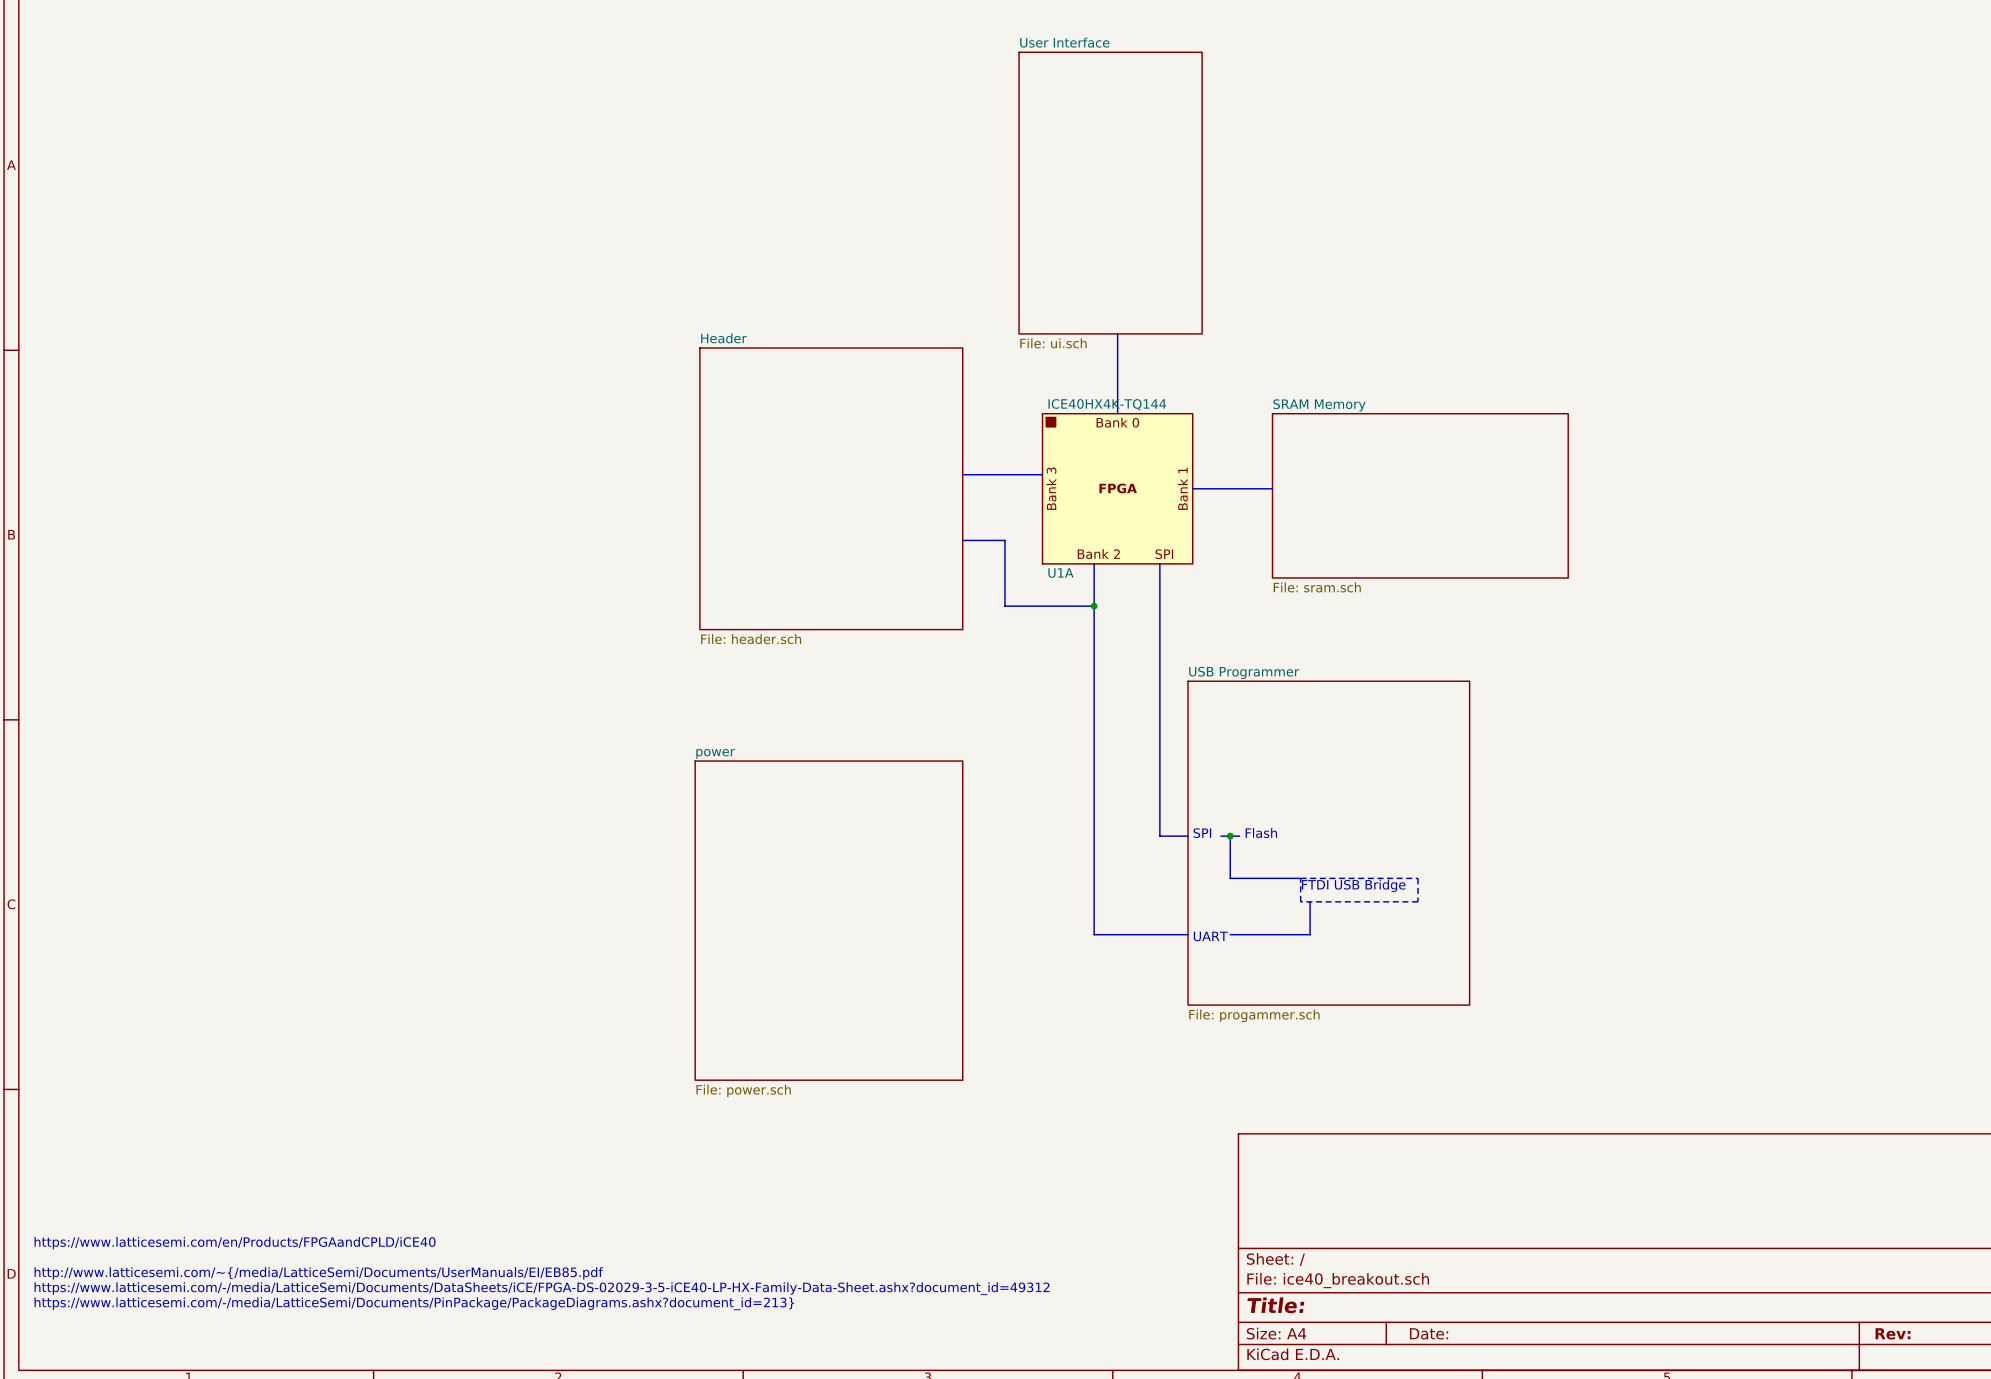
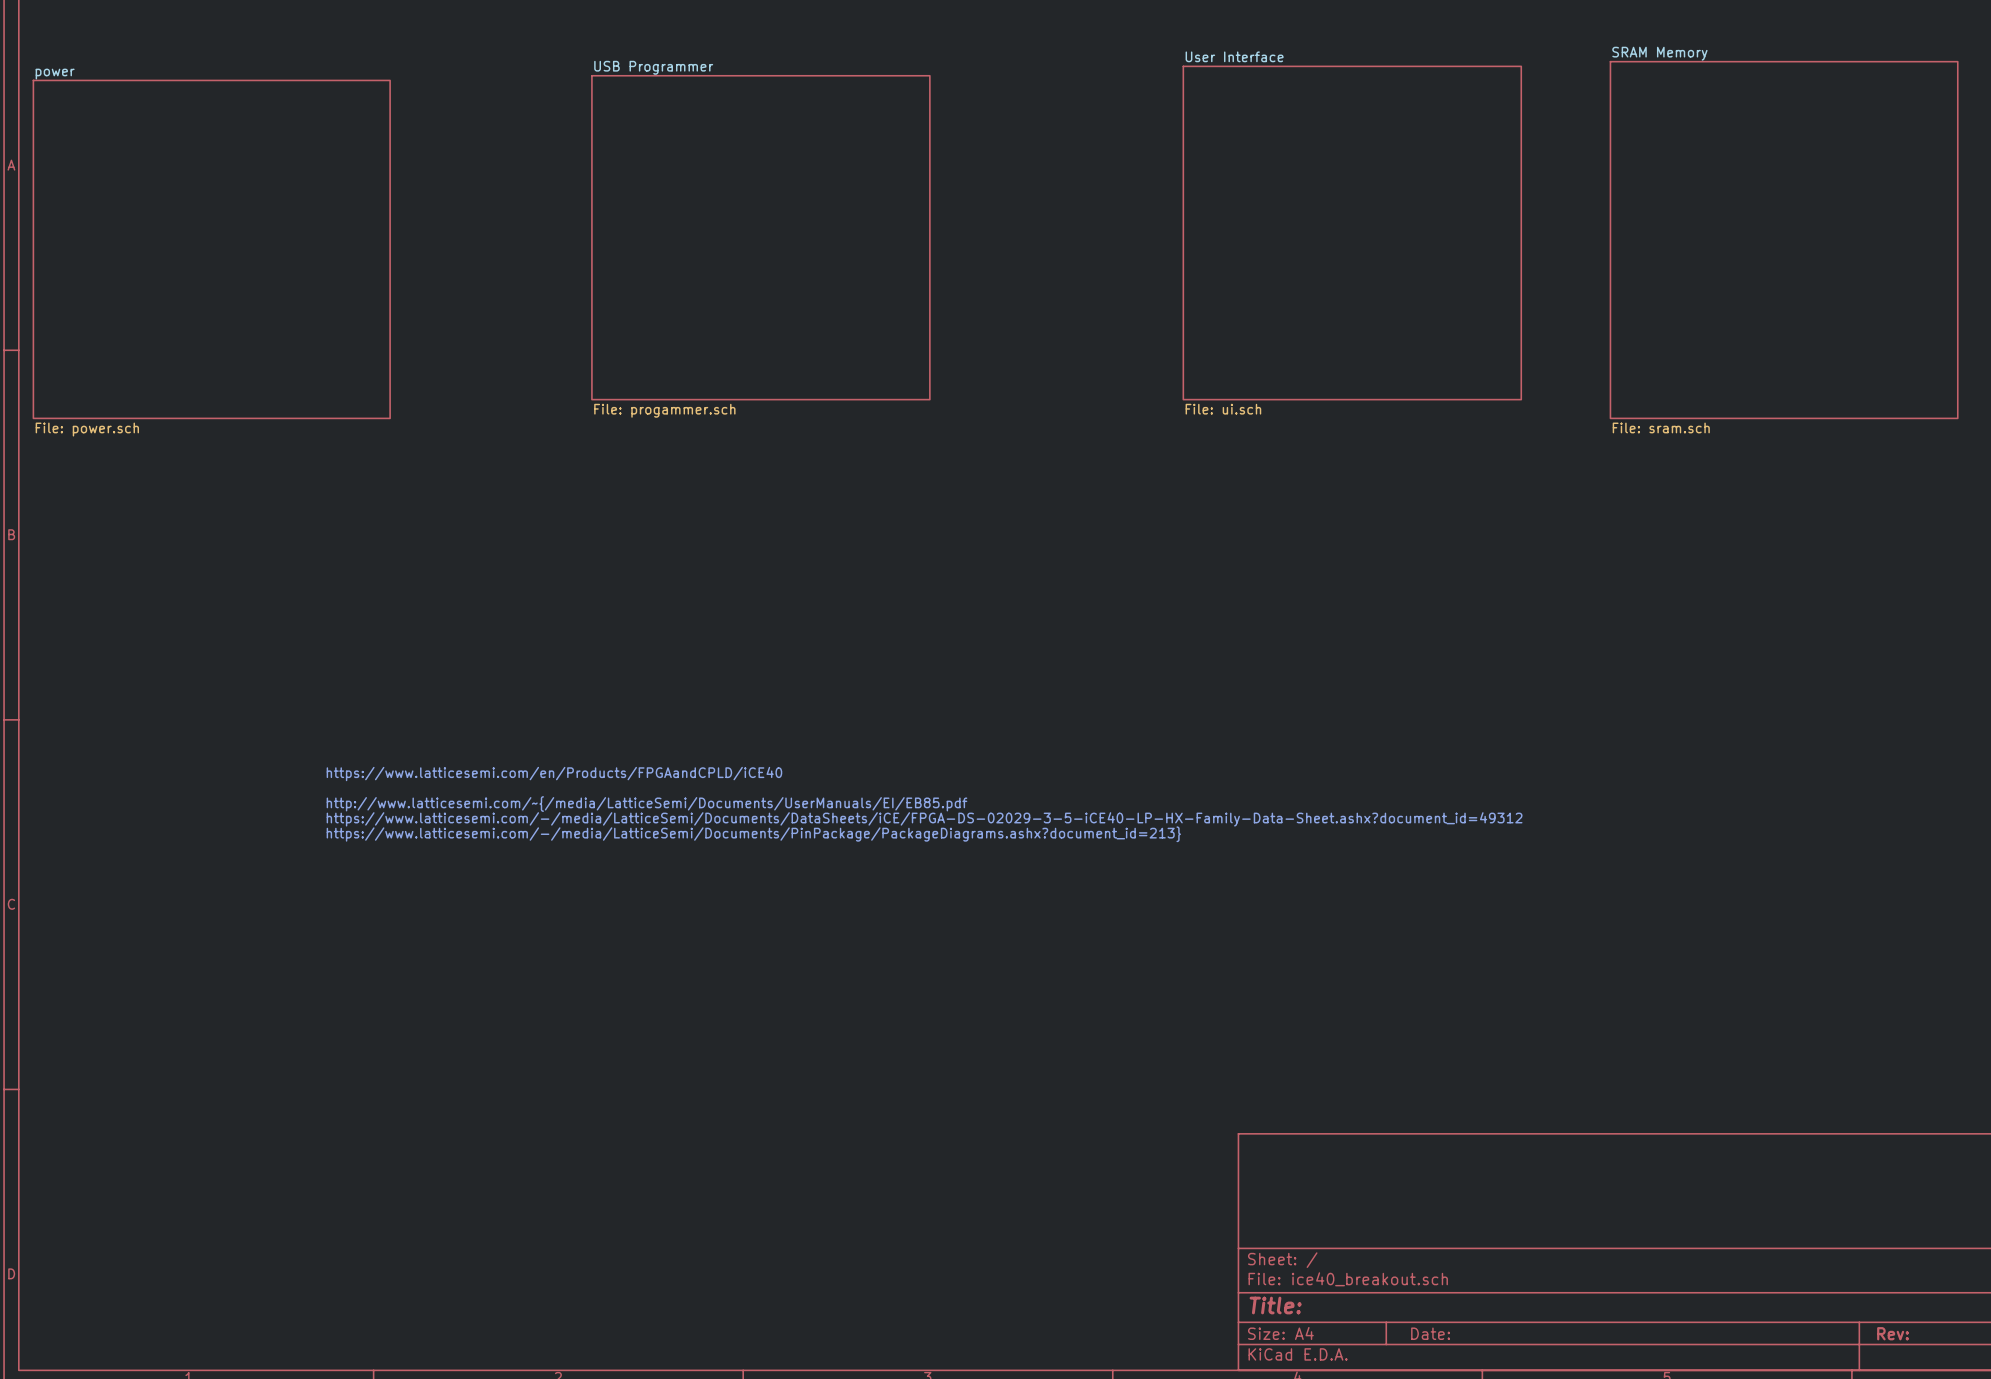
sheet User Interface: File: ui.sch (1110, 193) -> none
sheet User Interface: none -> File: ui.sch (1352, 232)
sheet USB Programmer: none -> File: progammer.sch (760, 237)
sheet SRAM Memory: none -> File: sram.sch (1784, 240)
sheet power: none -> File: power.sch (211, 249)
bus: (1117, 333) (1117, 413) -> none
bus: (962, 474) (1042, 474) -> none
sheet Header: File: header.sch (831, 488) -> none
U1A: ICE40HX4K-TQ144 (1117, 488) -> none
bus: (1192, 488) (1272, 488) -> none
sheet SRAM Memory: File: sram.sch (1420, 495) -> none
bus: (962, 540) (1004, 540) (1004, 606) (1094, 606) -> none
bus: (1094, 563) (1094, 934) (1188, 934) -> none
bus: (1159, 563) (1159, 836) (1188, 836) -> none
junction: (1094, 606) -> none
text: none -> https://www.latticesemi.com/en/Products/FPGAandCPLD/iCE40 (554, 774)
text: none -> http://www.latticesemi.com/~{/media/LatticeSemi/Documents/UserManuals/EI/EB85.pdf (646, 804)
text: none -> https://www.latticesemi.com/-/media/LatticeSemi/Documents/DataSheets/iCE/FPGA-DS-02029-3-5-iCE40-LP-HX-Family-Data-Sheet.ashx?document_id=49312 (924, 819)
text: SPI (1202, 833) -> none
text: Flash (1261, 833) -> none
text: none -> https://www.latticesemi.com/-/media/LatticeSemi/Documents/PinPackage/PackageDiagrams.ashx?document_id=213} (753, 834)
bus: (1220, 836) (1239, 836) -> none
bus: (1230, 836) (1230, 878) (1300, 878) -> none
junction: (1230, 836) -> none
sheet USB Programmer: File: progammer.sch (1328, 843) -> none
line: (1300, 878) (1418, 878) (1418, 901) (1300, 901) (1300, 878) -> none
text: FTDI USB Bridge (1353, 885) -> none
bus: (1310, 901) (1310, 934) (1230, 934) -> none
sheet power: File: power.sch (828, 920) -> none
text: UART (1210, 936) -> none
text: https://www.latticesemi.com/en/Products/FPGAandCPLD/iCE40 (235, 1243) -> none
text: http://www.latticesemi.com/~{/media/LatticeSemi/Documents/UserManuals/EI/EB85.pdf (318, 1273) -> none
text: https://www.latticesemi.com/-/media/LatticeSemi/Documents/DataSheets/iCE/FPGA-DS-02029-3-5-iCE40-LP-HX-Family-Data-Sheet.ashx?document_id=49312 (542, 1288) -> none
text: https://www.latticesemi.com/-/media/LatticeSemi/Documents/PinPackage/PackageDiagrams.ashx?document_id=213} (414, 1303) -> none

